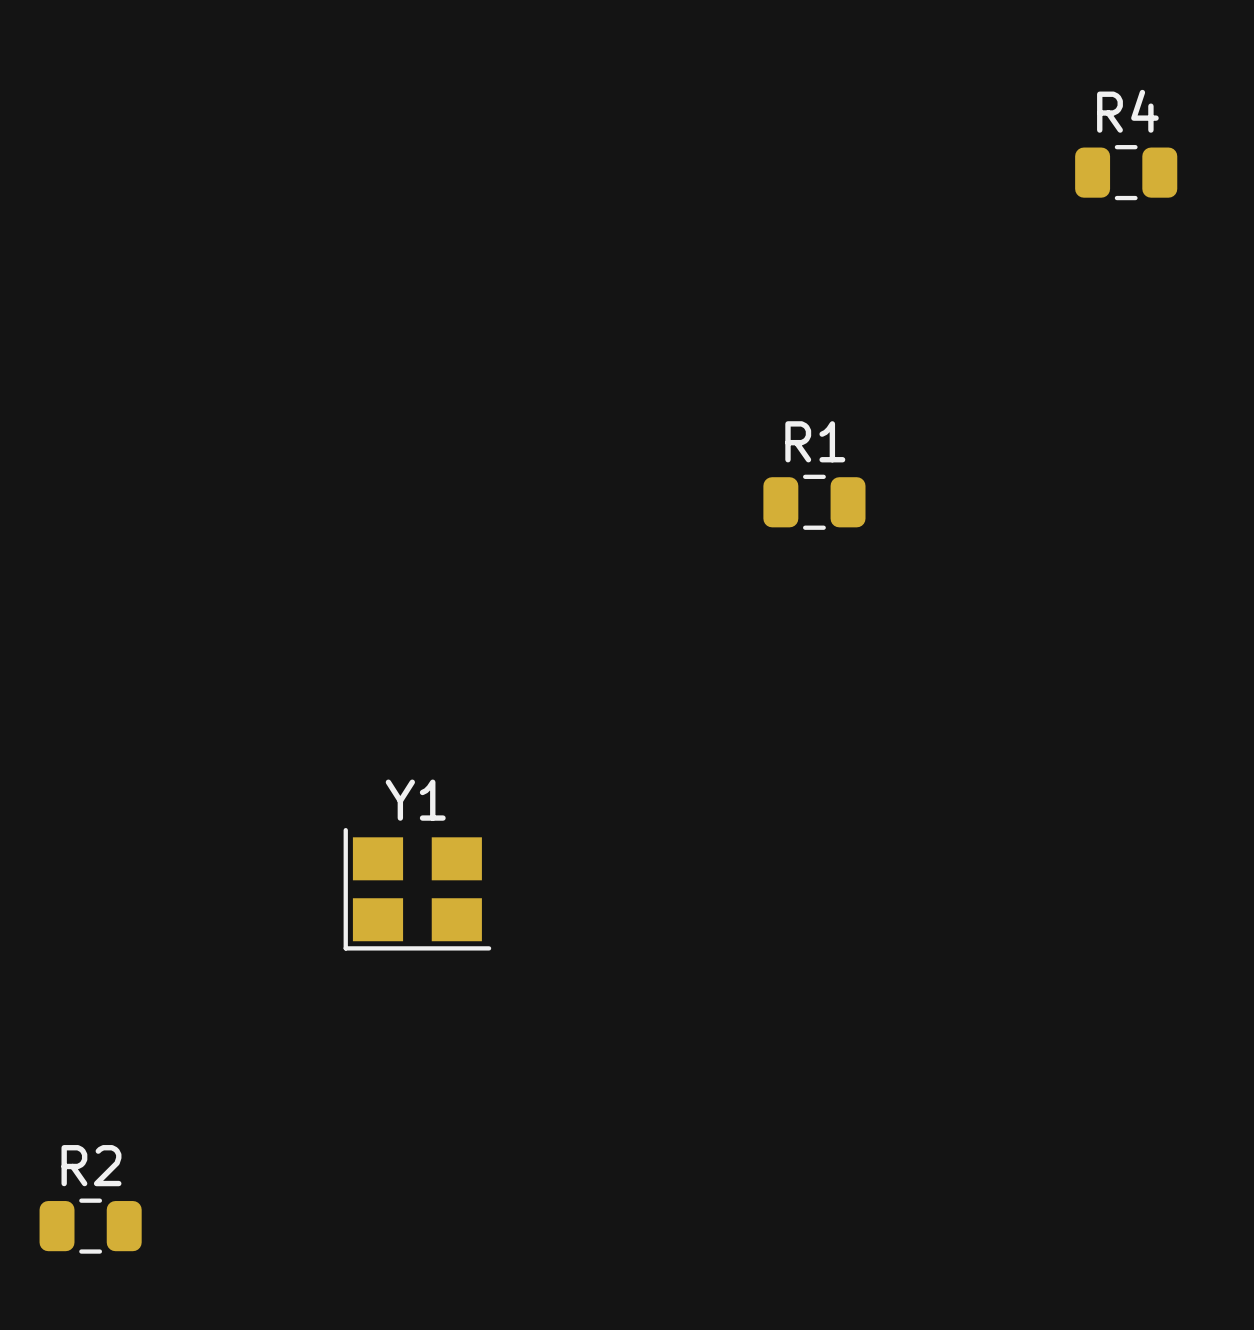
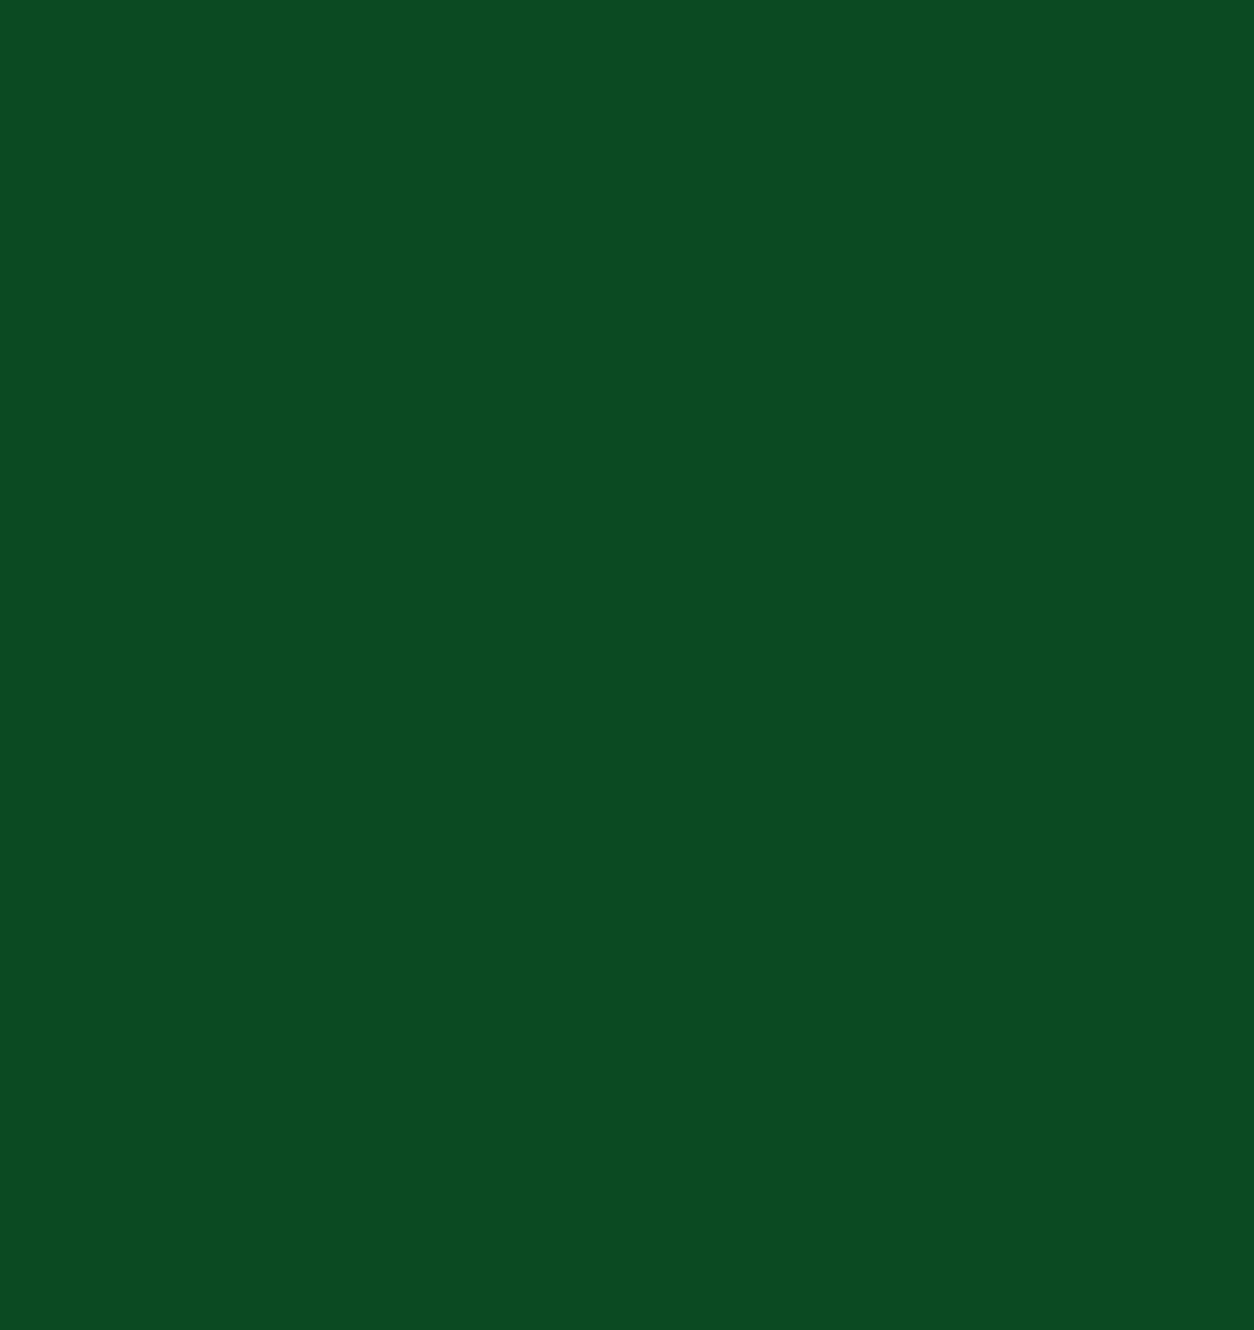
R4: (1126, 172) -> none
R1: (814, 502) -> none
Y1: (417, 889) -> none
R2: (90, 1226) -> none

